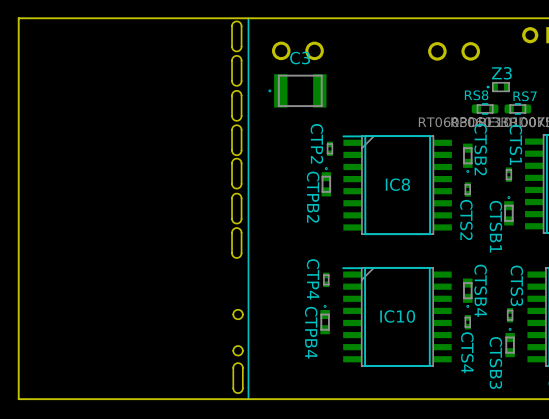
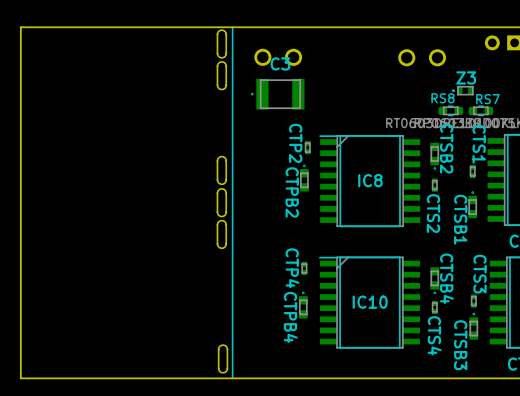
board edge: (241, 95) (241, 117) (235, 120) (232, 116) (232, 94) (237, 90) (241, 95) -> none
board edge: (241, 130) (241, 151) (235, 155) (232, 151) (232, 128) (237, 125) (241, 130) -> none
board edge: (242, 314) (238, 319) (233, 314) (238, 309) (242, 314) -> none
board edge: (242, 350) (238, 346) (233, 350) (238, 355) (242, 350) -> none

